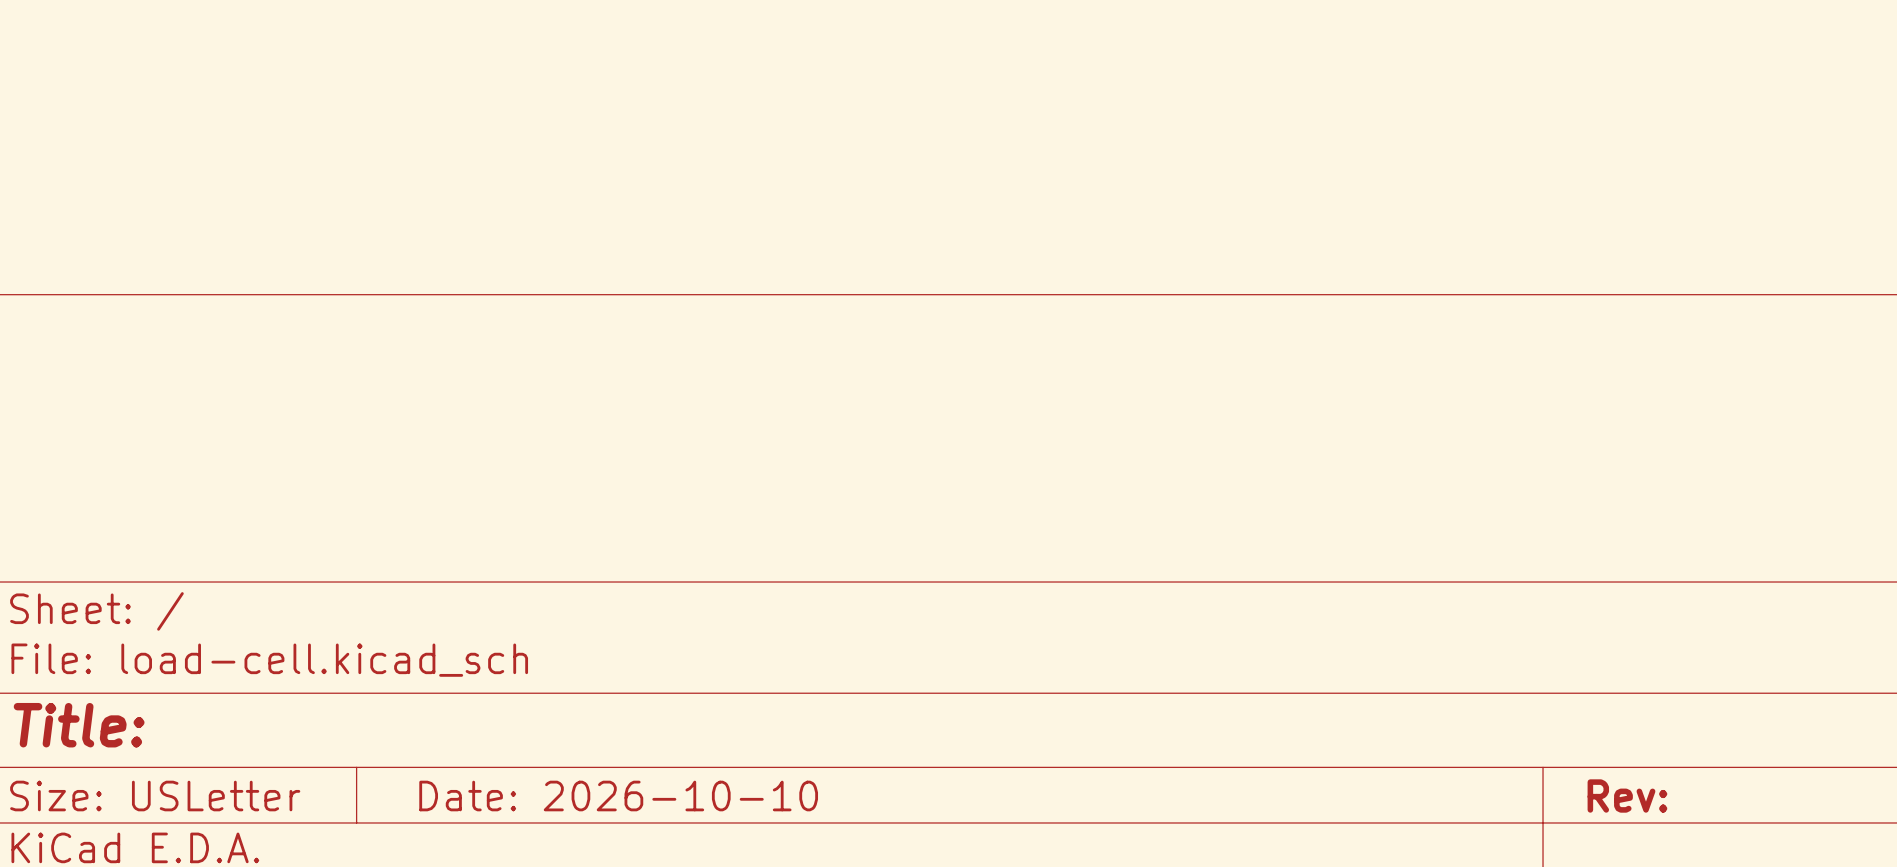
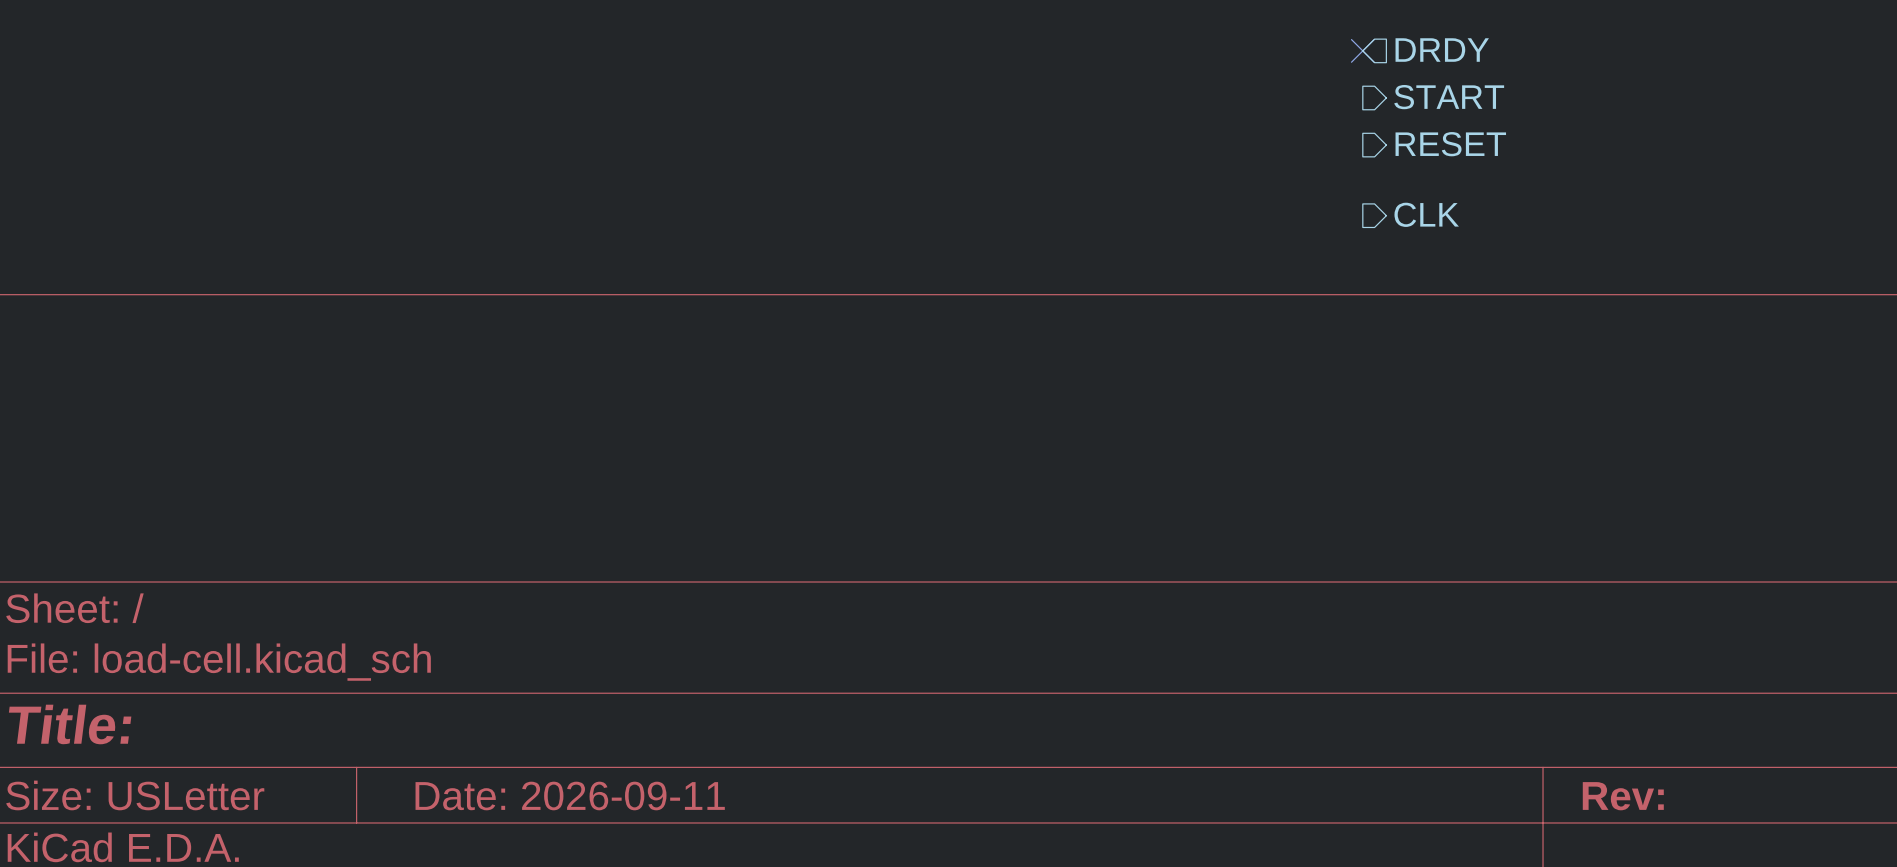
no-connect mark: none -> (1362, 50)
sheet pin: none -> DRDY (1442, 50)
sheet pin: none -> START (1449, 97)
sheet pin: none -> RESET (1450, 144)
sheet pin: none -> CLK (1426, 214)
title block: Date: 2026-10-10 (618, 796) -> Date: 2026-09-11 (570, 795)

